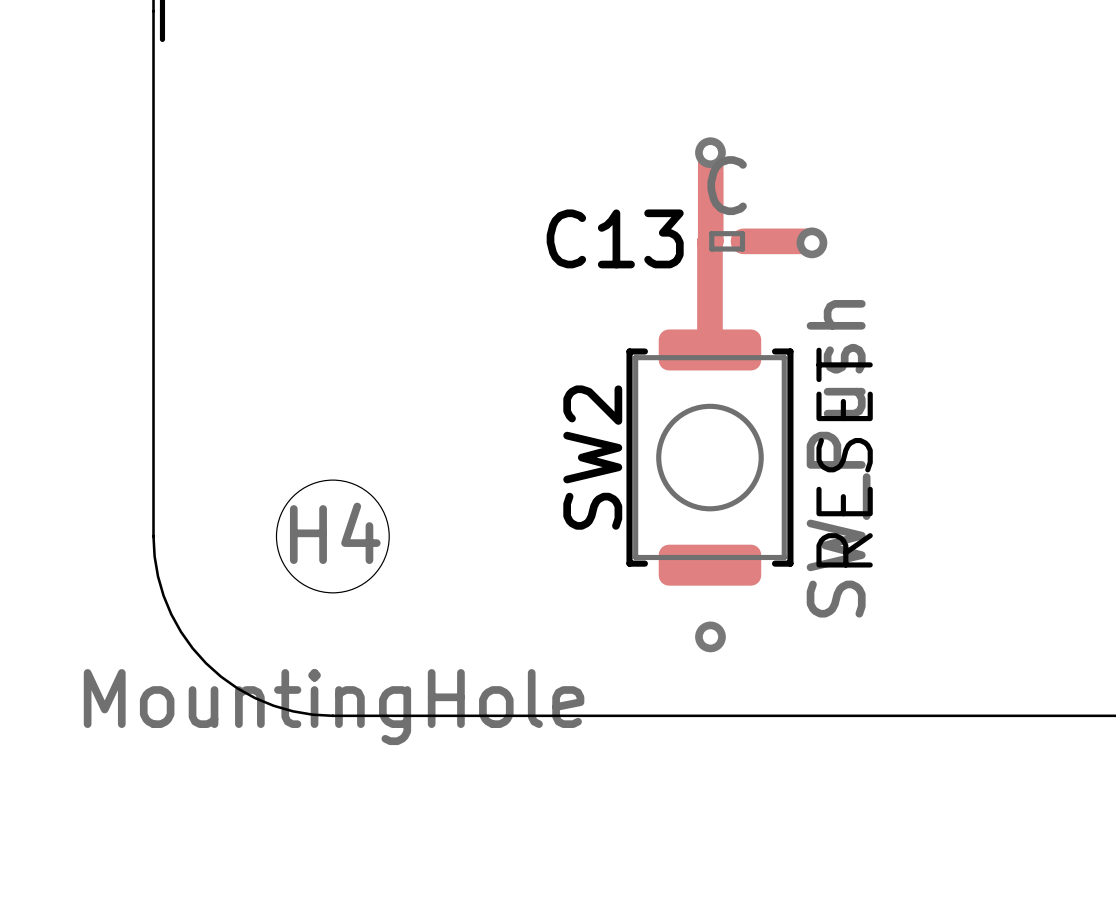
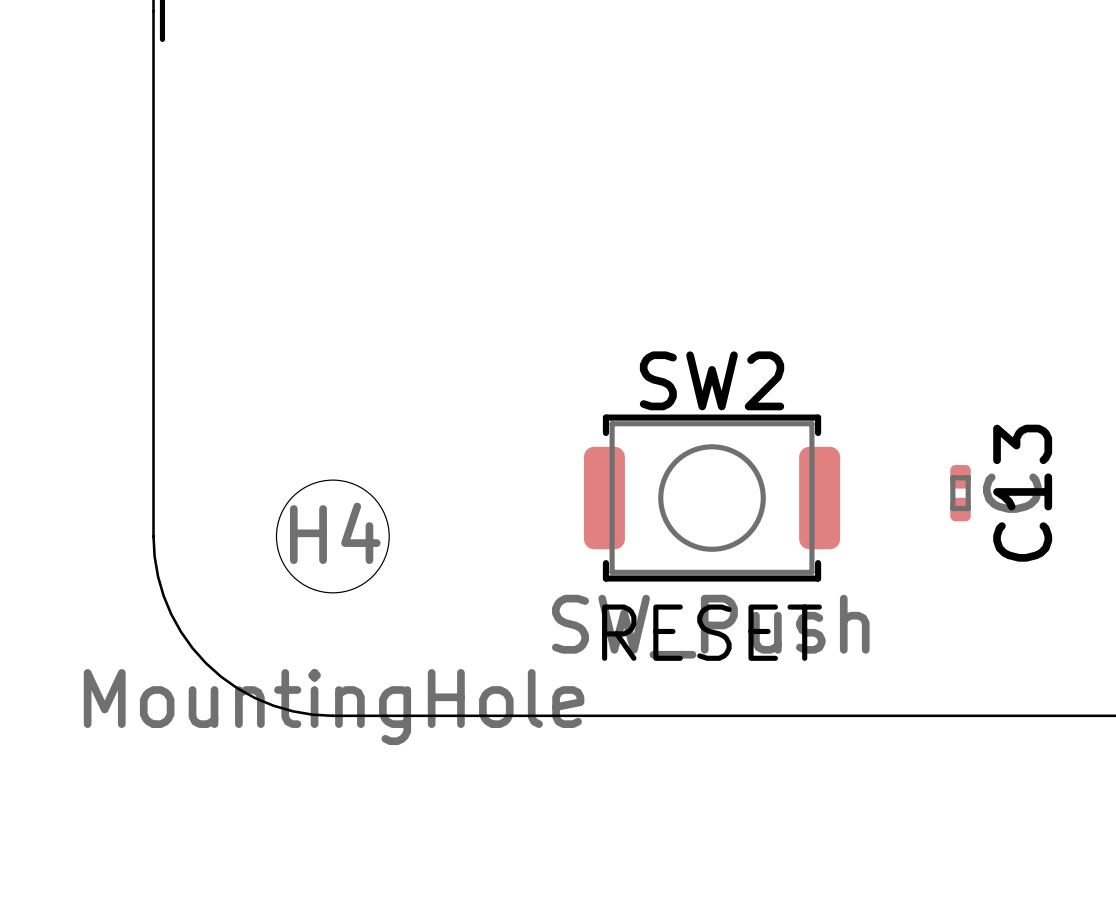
track: (710, 152) (709, 349) -> none
via: (710, 152) -> none
C13 name position: C13 (615, 238) -> C13 (1022, 493)
C13 rotation: 0° (727, 241) -> 90° clockwise (960, 493)
C13 position: (727, 241) -> (960, 493)
track: (743, 241) (810, 241) (811, 242) -> none
via: (811, 242) -> none
SW2 rotation: 0° (709, 457) -> 90° clockwise (712, 498)
text rotation: 0° (844, 457) -> 90° clockwise (711, 632)
via: (710, 636) -> none

